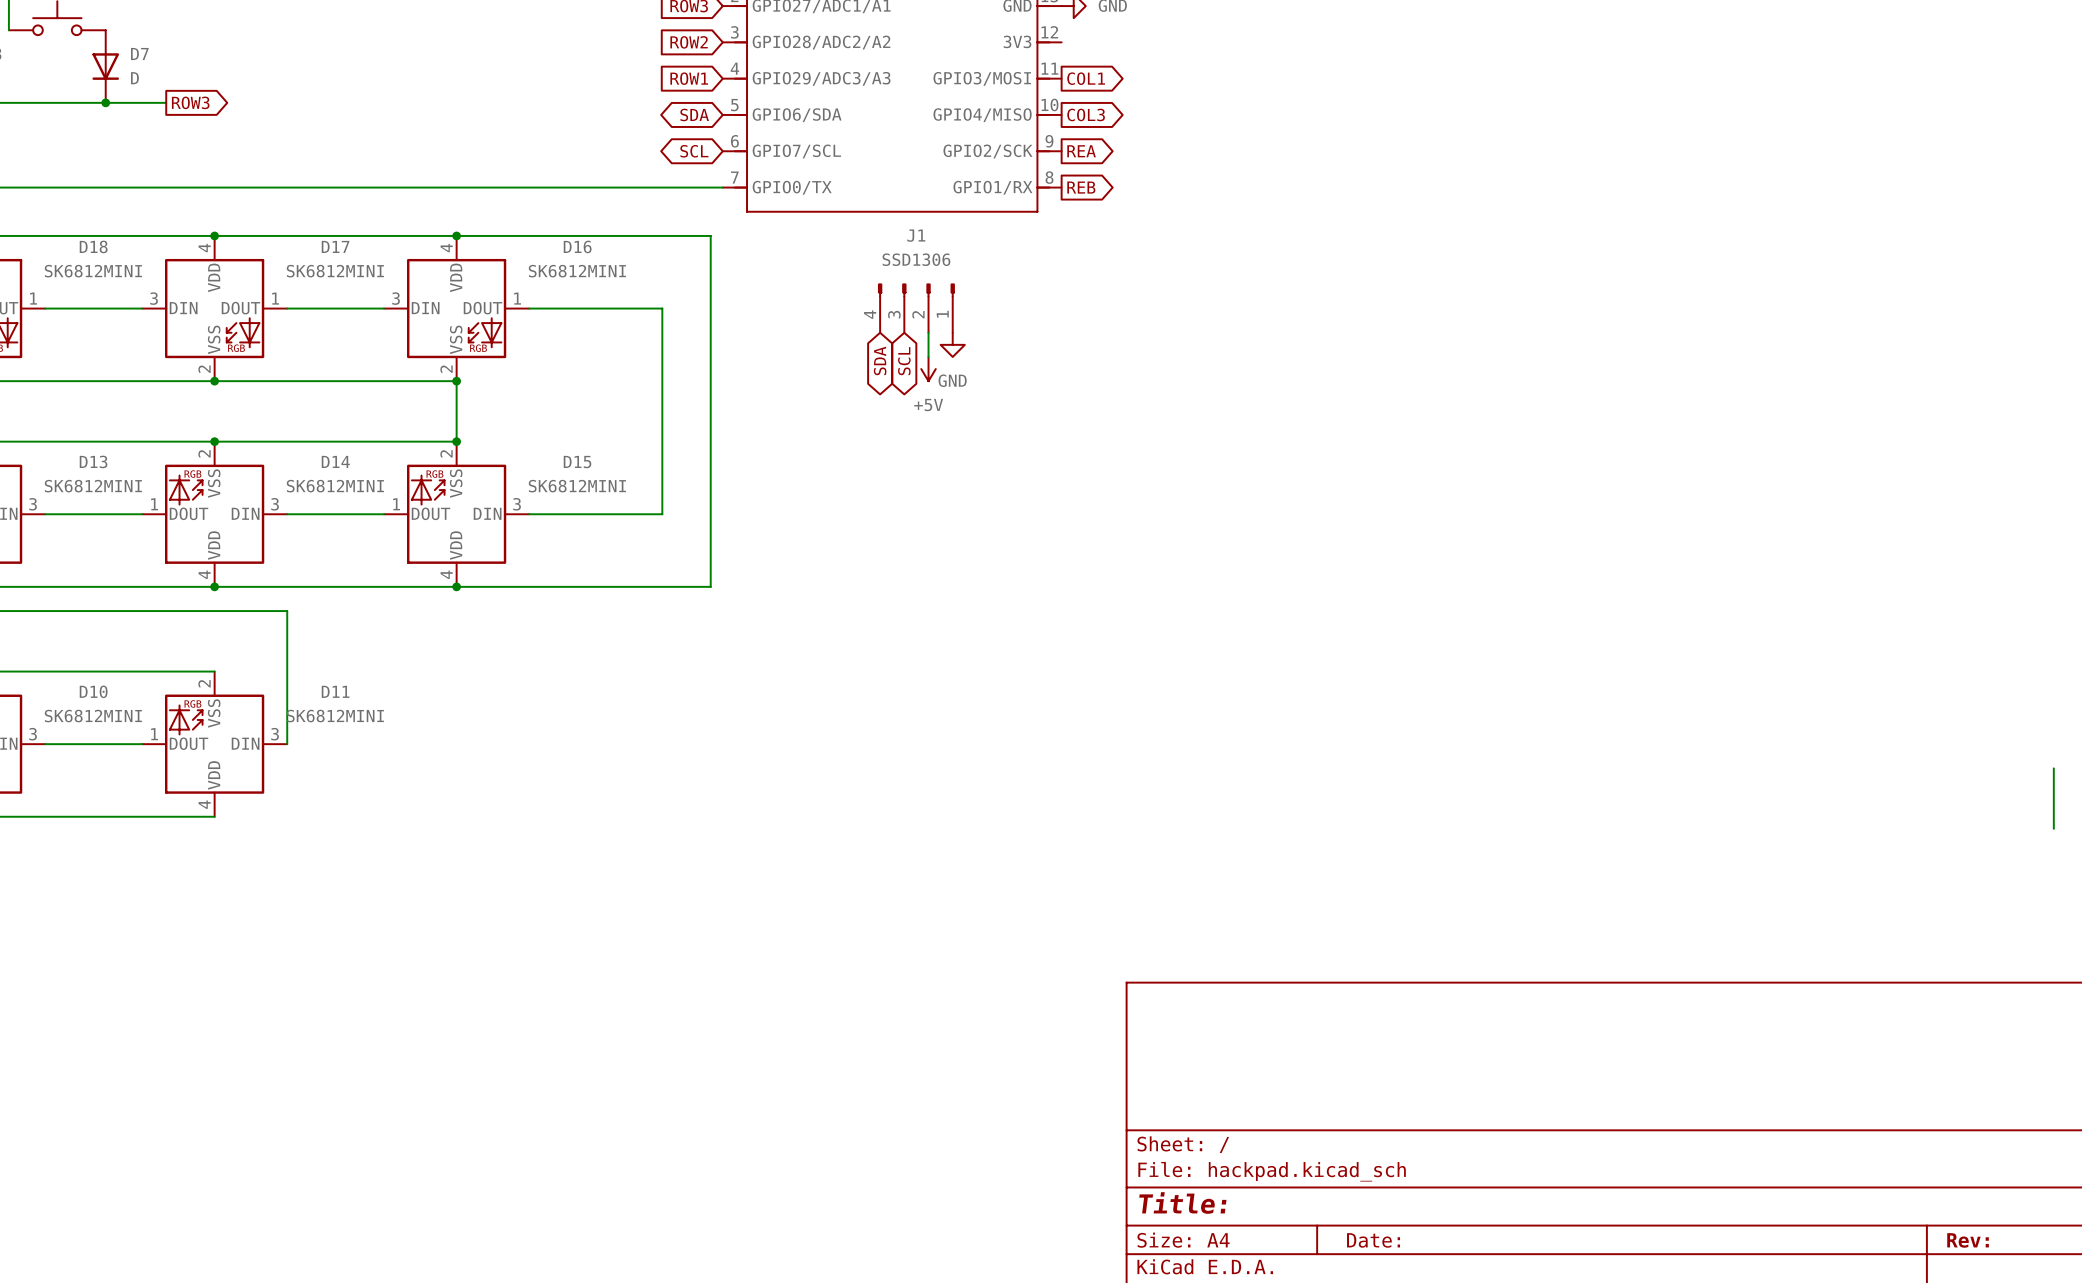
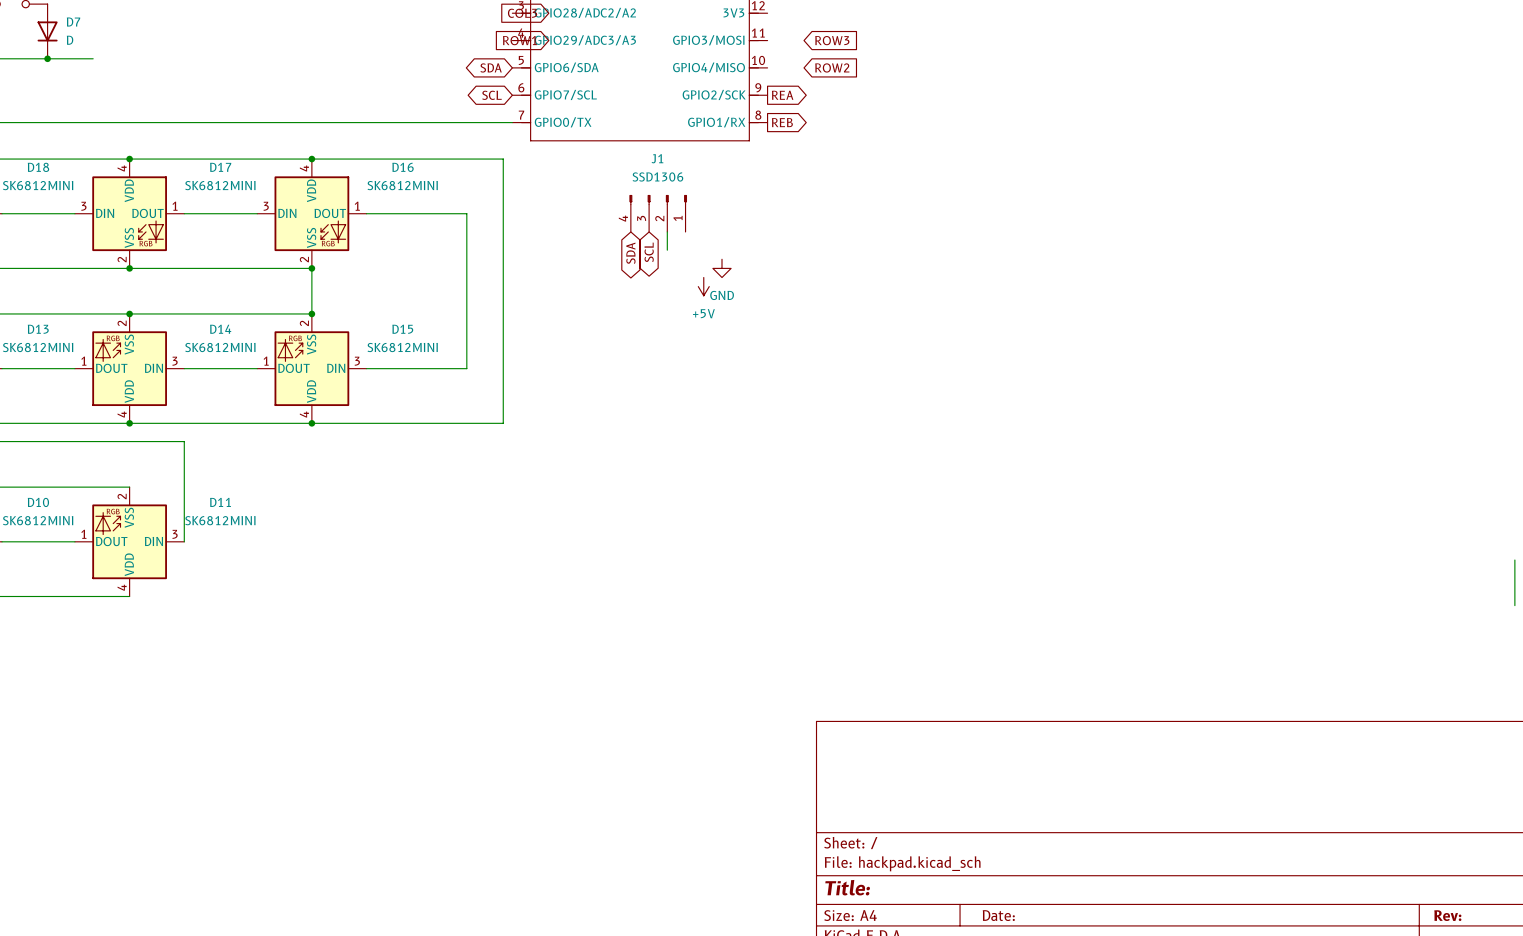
global label: ROW2 (689, 42) -> none
global label: none -> COL3 (522, 13)
global label position: ROW1 (689, 78) -> ROW1 (520, 40)
global label: COL1 (1086, 78) -> none
global label: none -> ROW3 (832, 40)
global label: ROW3 (190, 102) -> none
global label: COL3 (1086, 114) -> none
global label: none -> ROW2 (832, 67)
power symbol position: GND (952, 344) -> GND (722, 268)
power symbol position: +5V (928, 369) -> +5V (703, 286)

